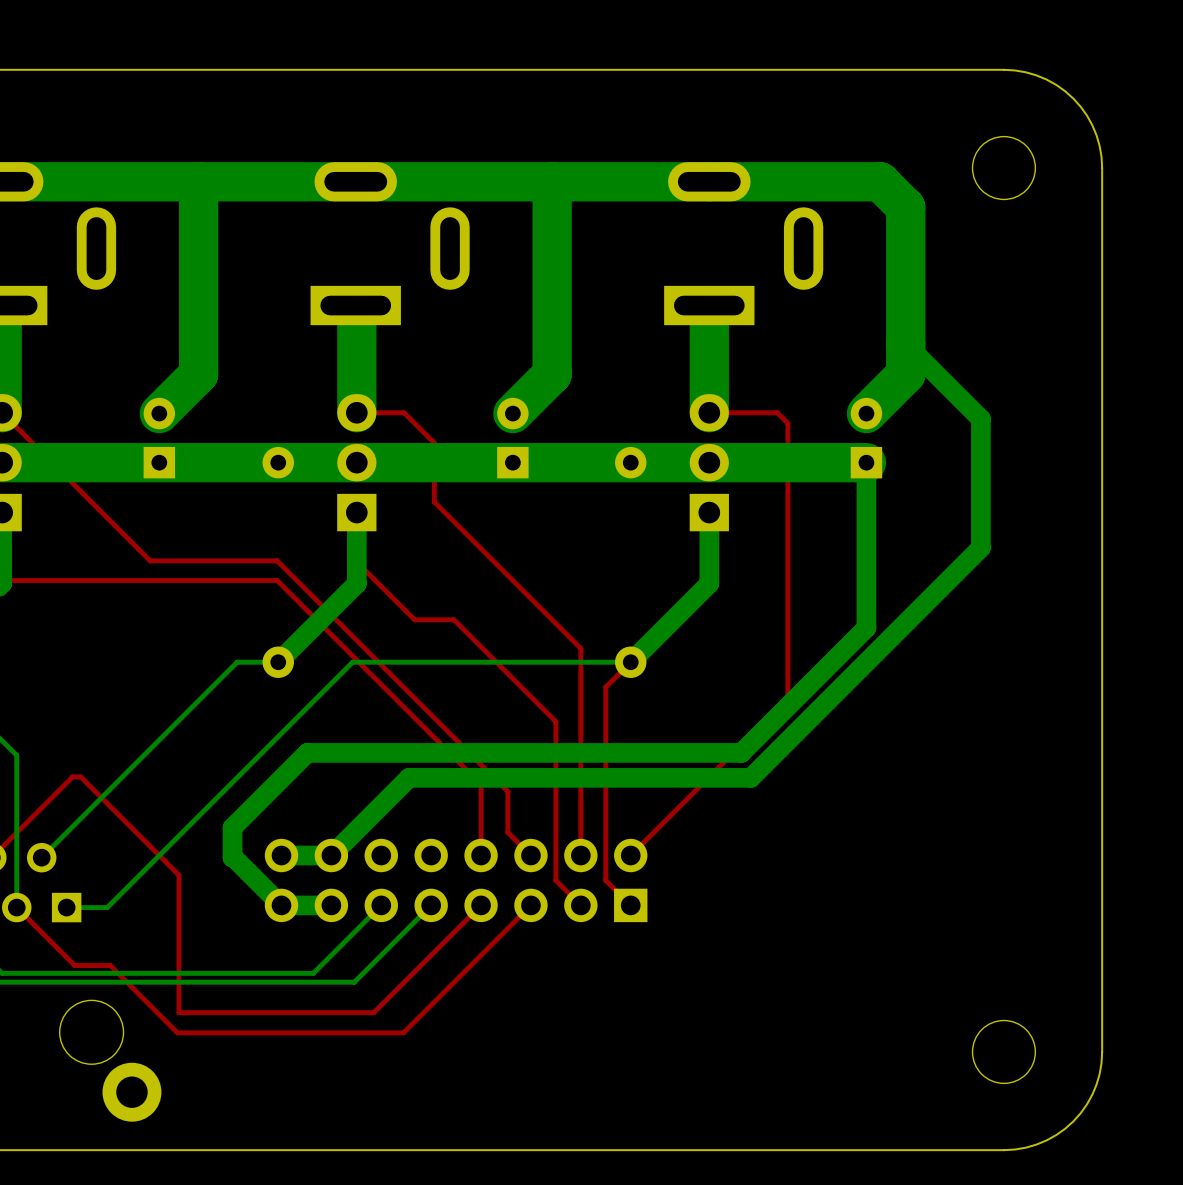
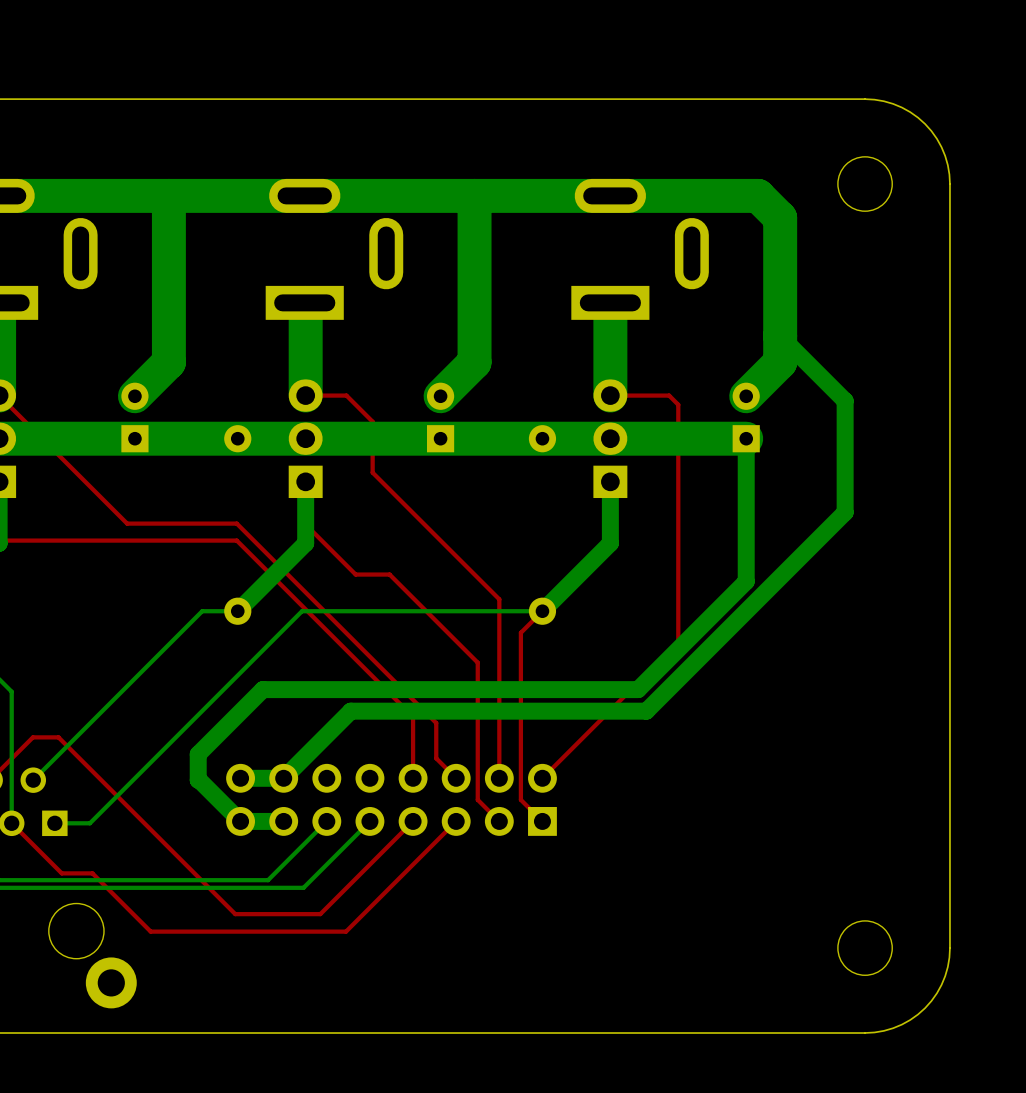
top track: (41, 808) (72, 776) (80, 776) (178, 875) (178, 1012) (275, 1012) -> (32, 737) (58, 737) (235, 914)

